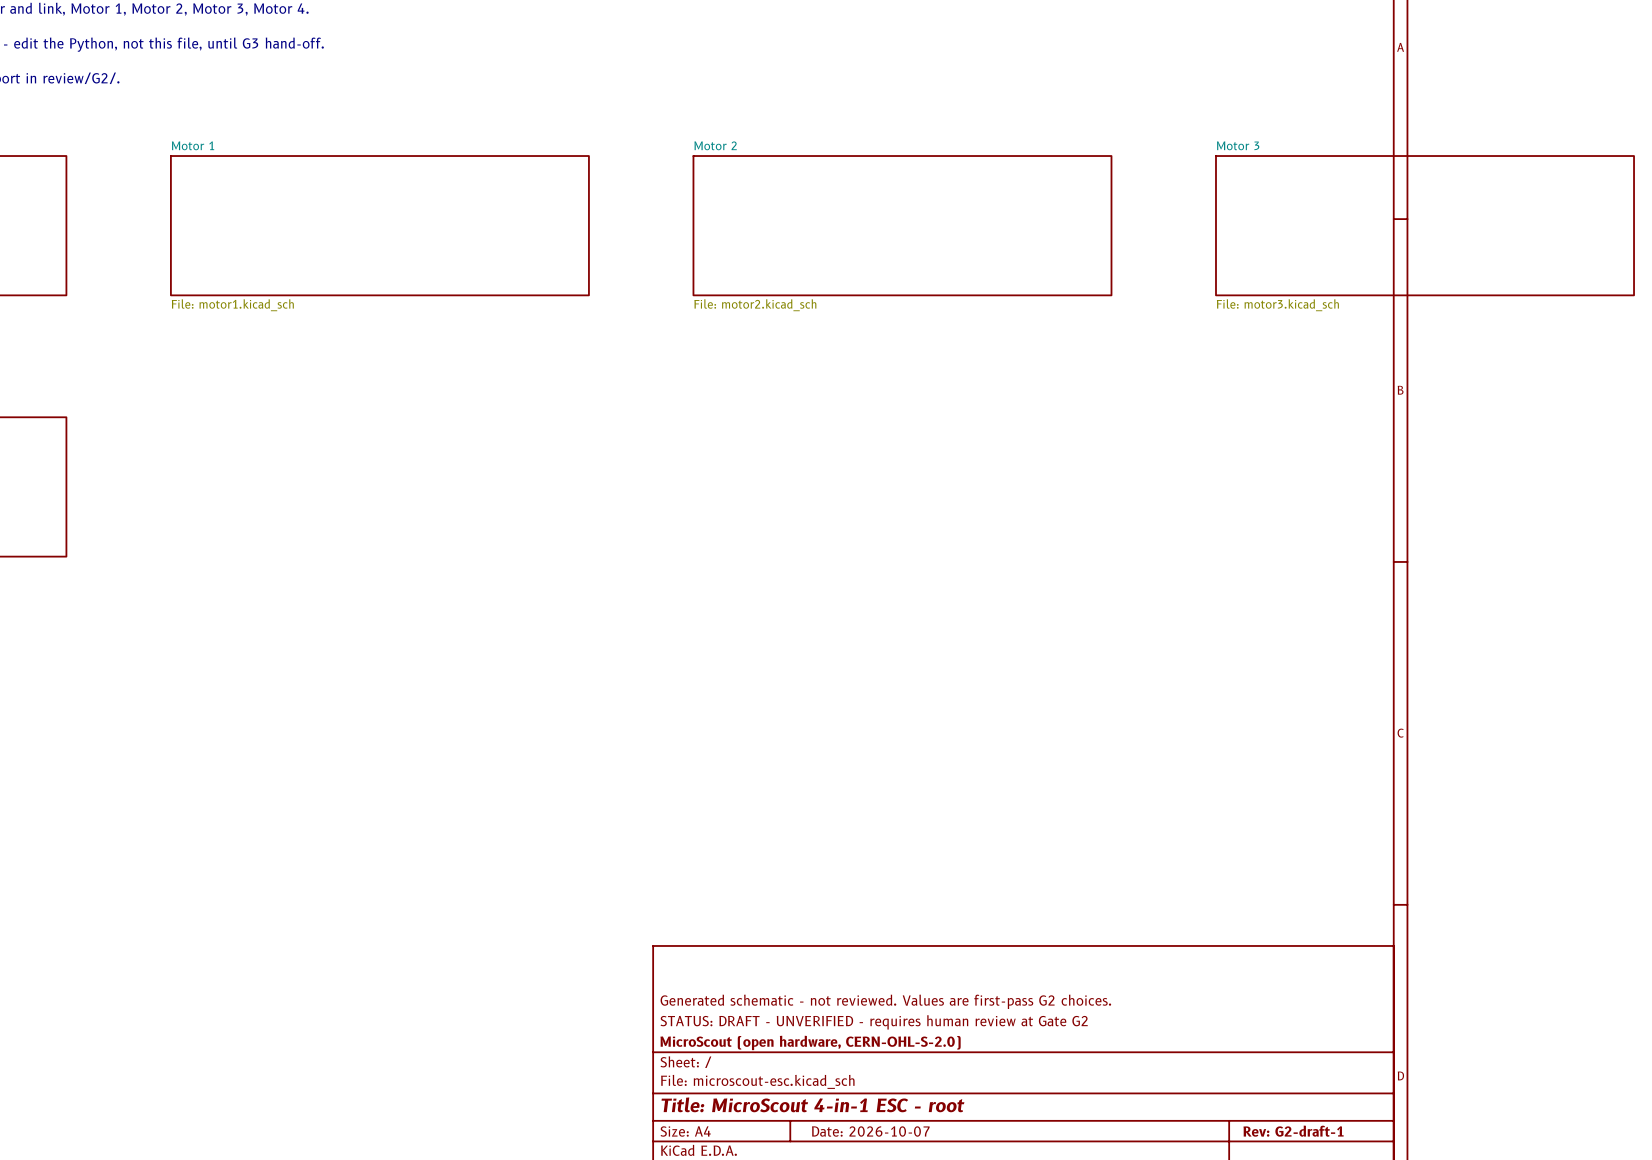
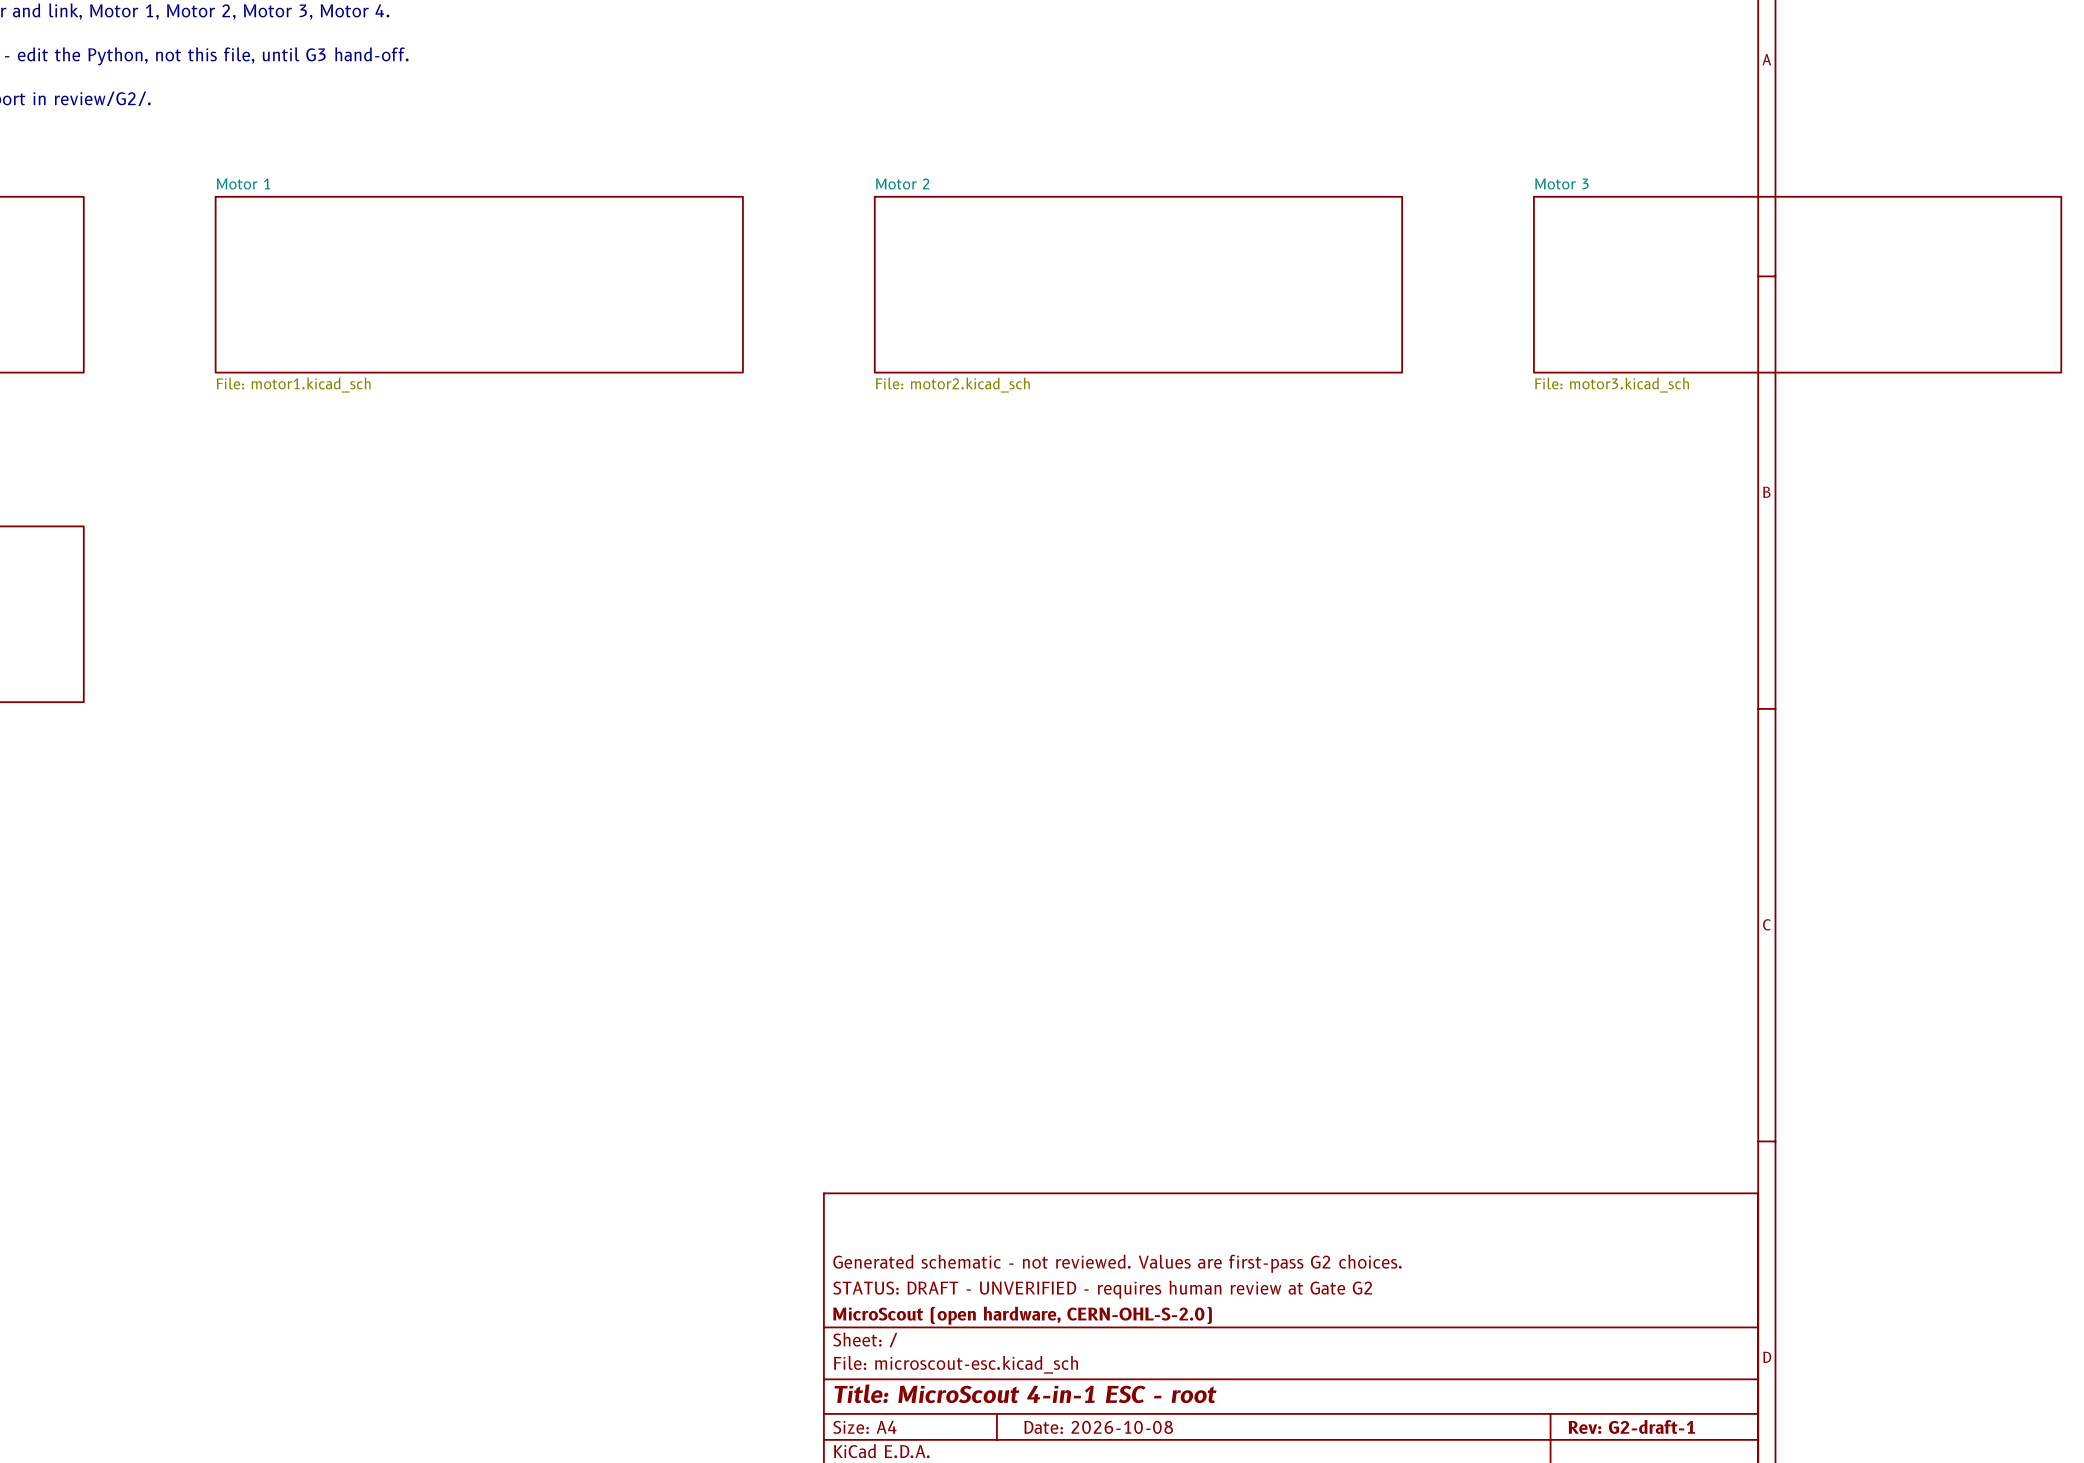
title block: Date: 2026-10-07 (870, 1131) -> Date: 2026-10-08 (1098, 1427)

